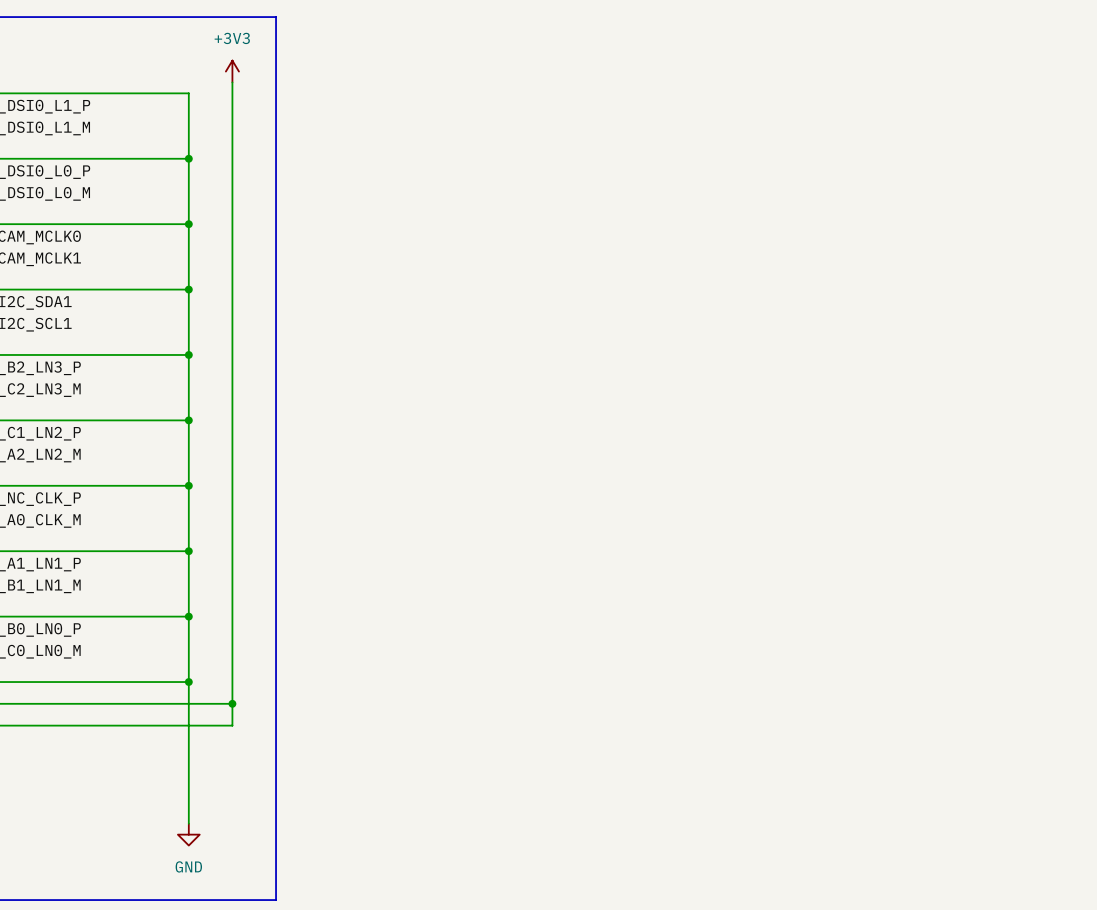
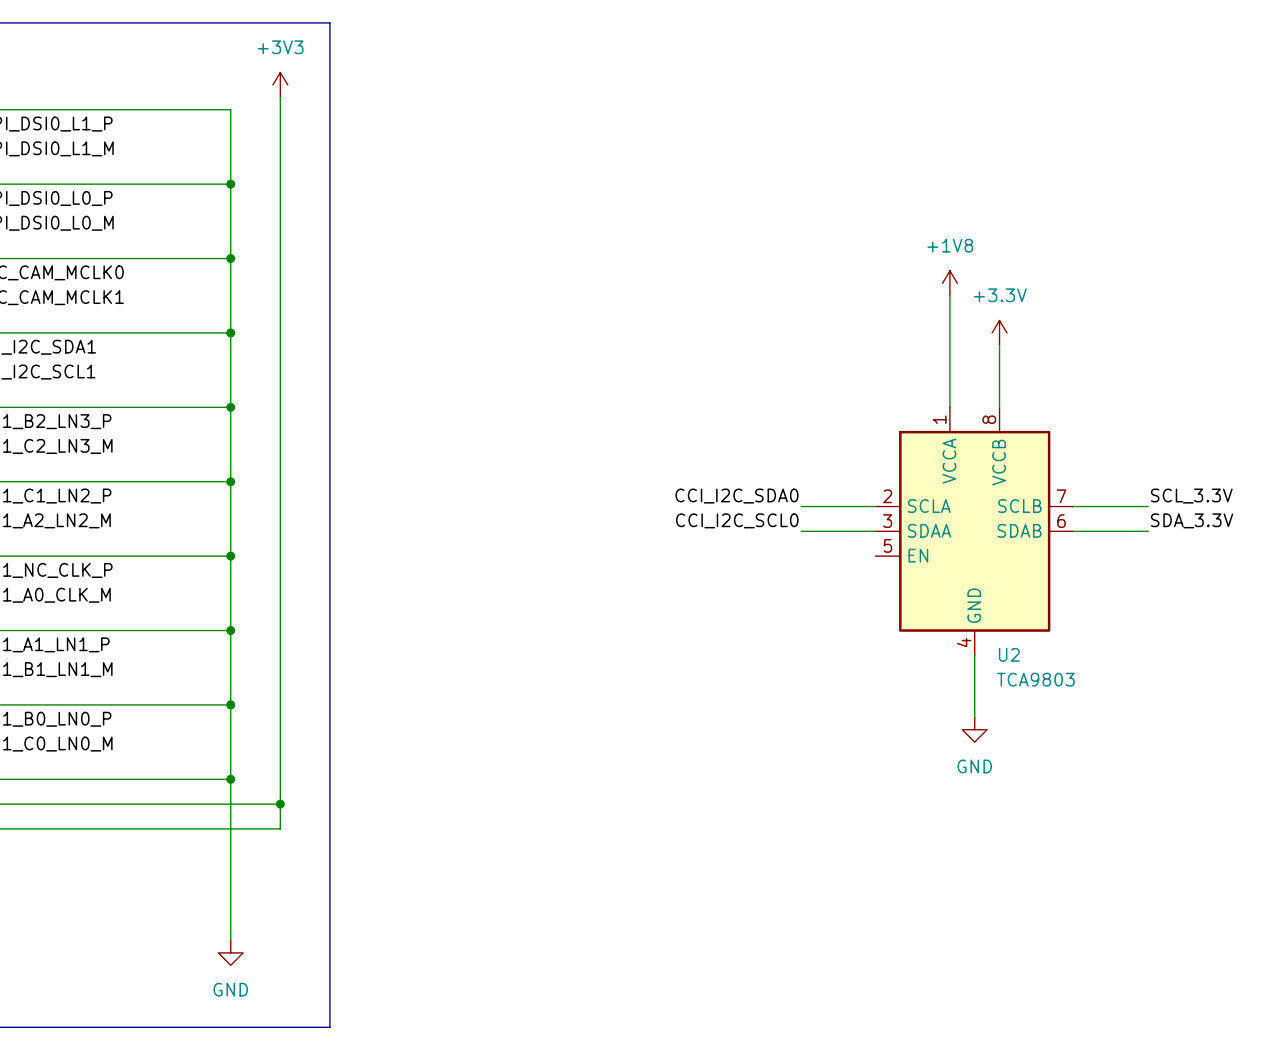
power symbol: none -> +1V8 (949, 283)
wire: none -> (949, 295) (949, 407)
power symbol: none -> +3.3V (999, 332)
wire: none -> (999, 345) (999, 407)
label: none -> CCI_I2C_SDA0 (736, 496)
label: none -> SCL_3.3V (1191, 496)
wire: none -> (801, 506) (875, 506)
wire: none -> (1073, 506) (1148, 506)
label: none -> CCI_I2C_SCL0 (737, 520)
label: none -> SDA_3.3V (1192, 520)
wire: none -> (801, 531) (875, 531)
U2: none -> TCA9803 (974, 531)
wire: none -> (1073, 531) (1148, 531)
wire: none -> (974, 655) (974, 717)
power symbol: none -> GND (974, 729)

